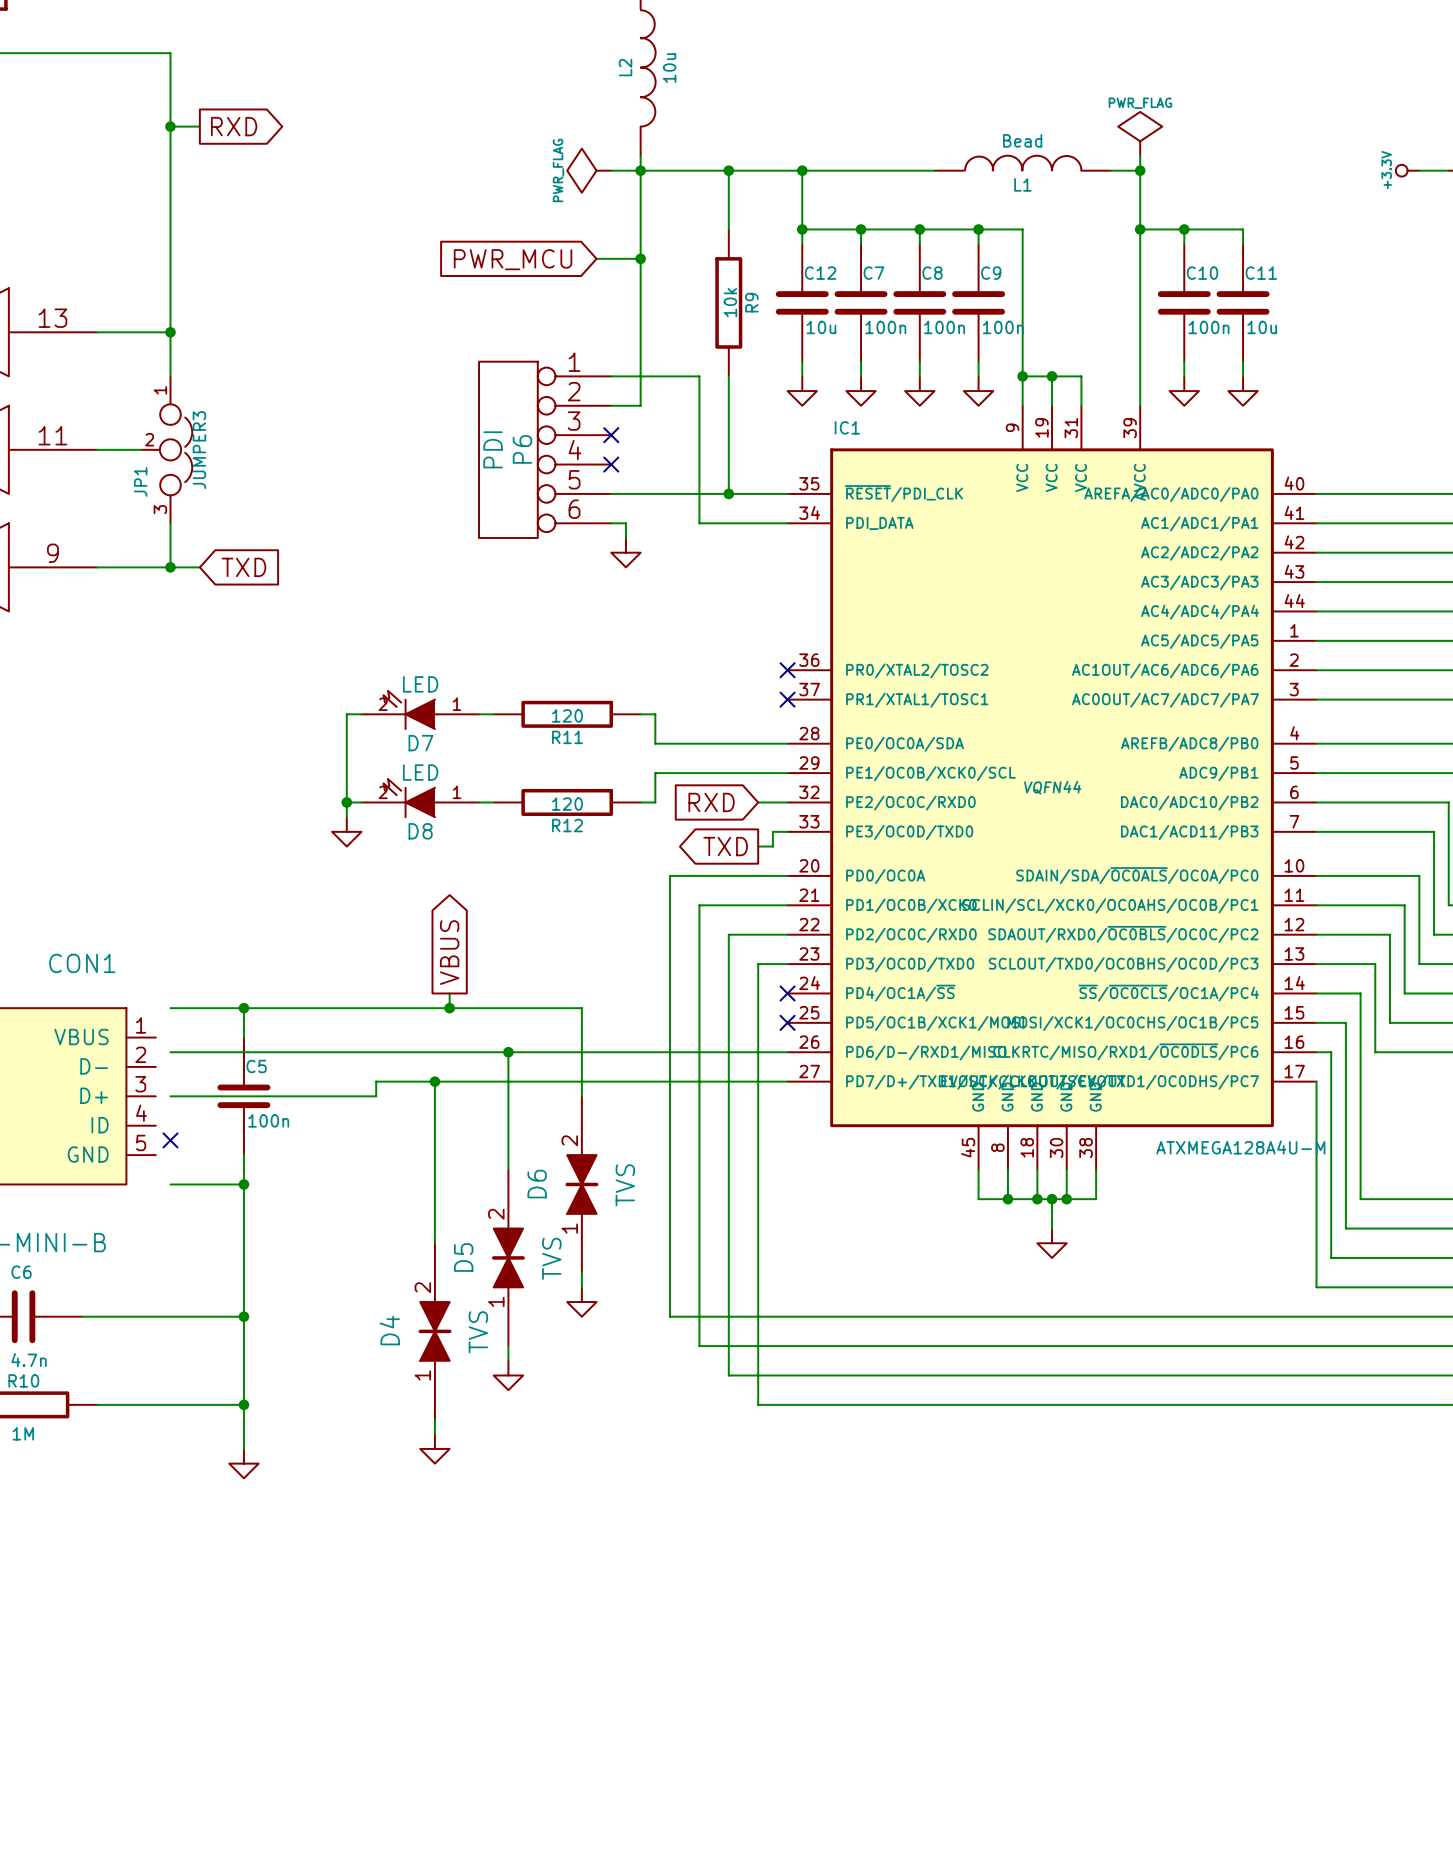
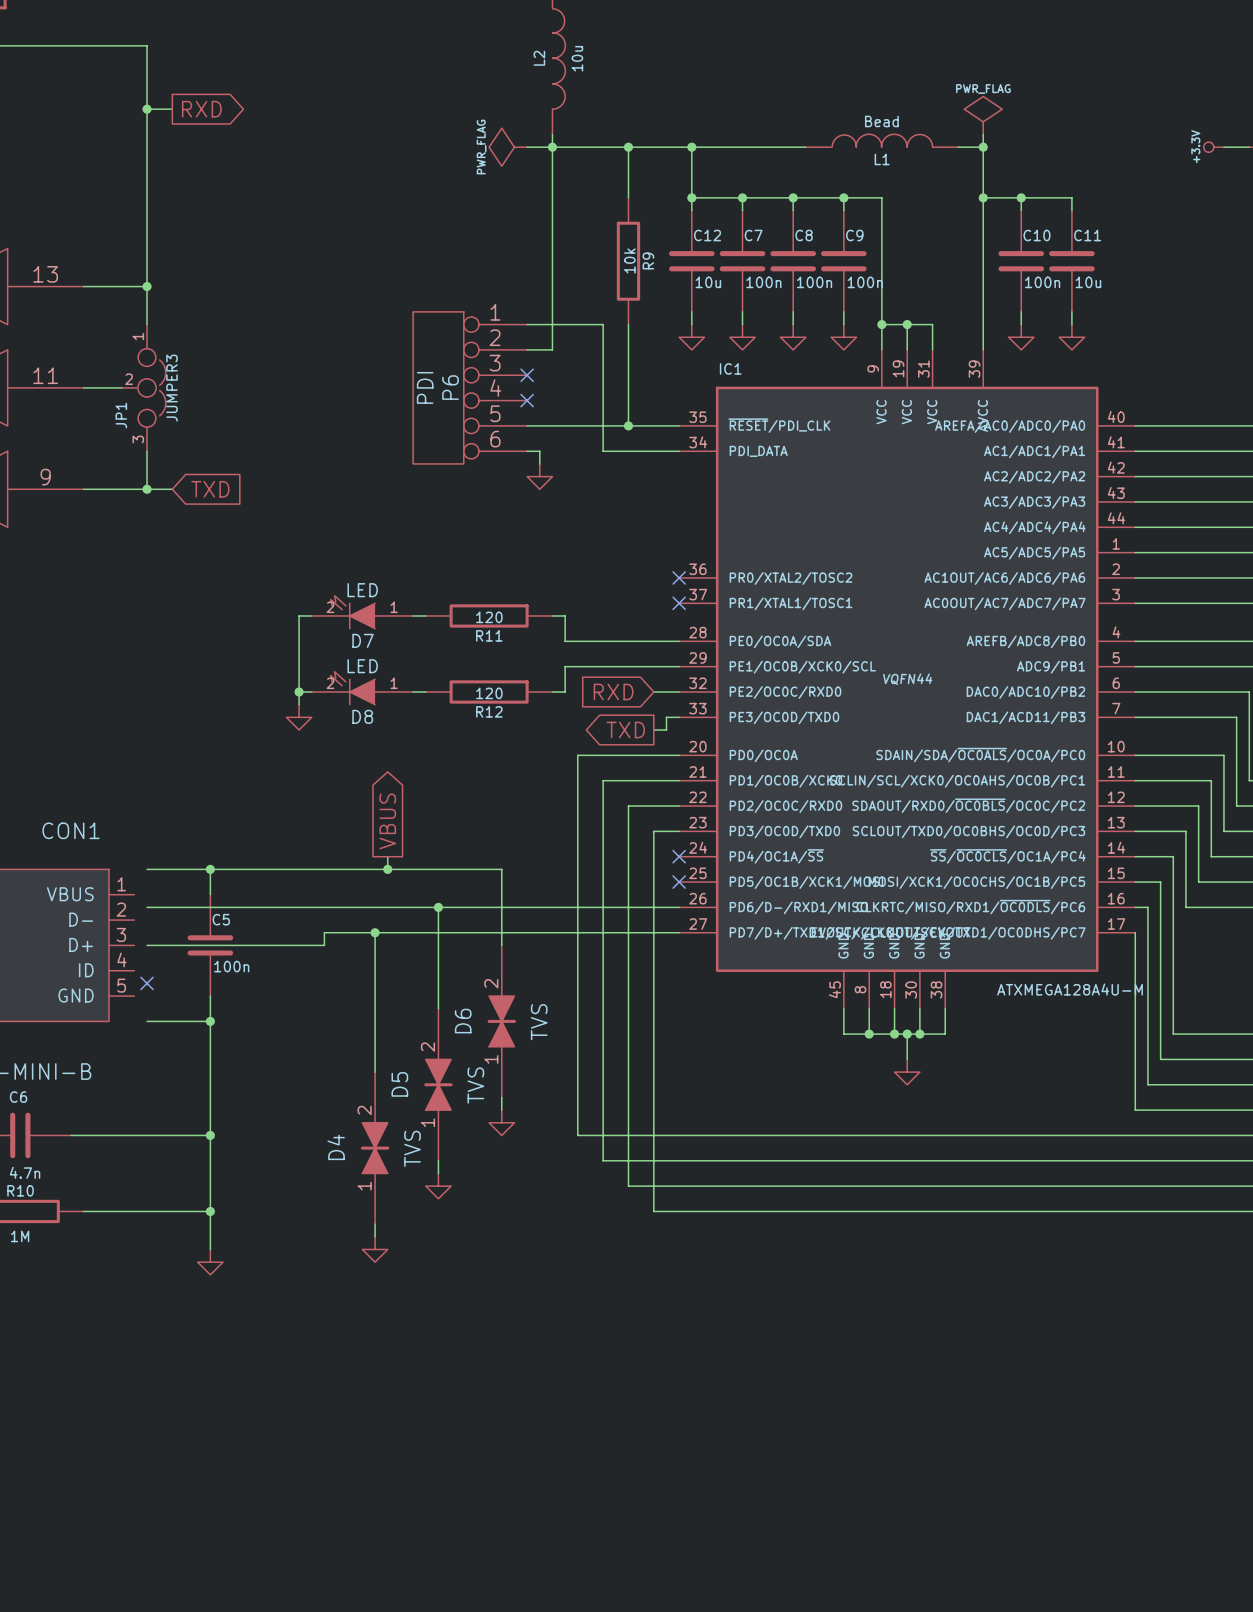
wire: (596, 258) (640, 258) -> none
junction: (640, 258) -> none
global label: PWR_MCU (513, 259) -> none

